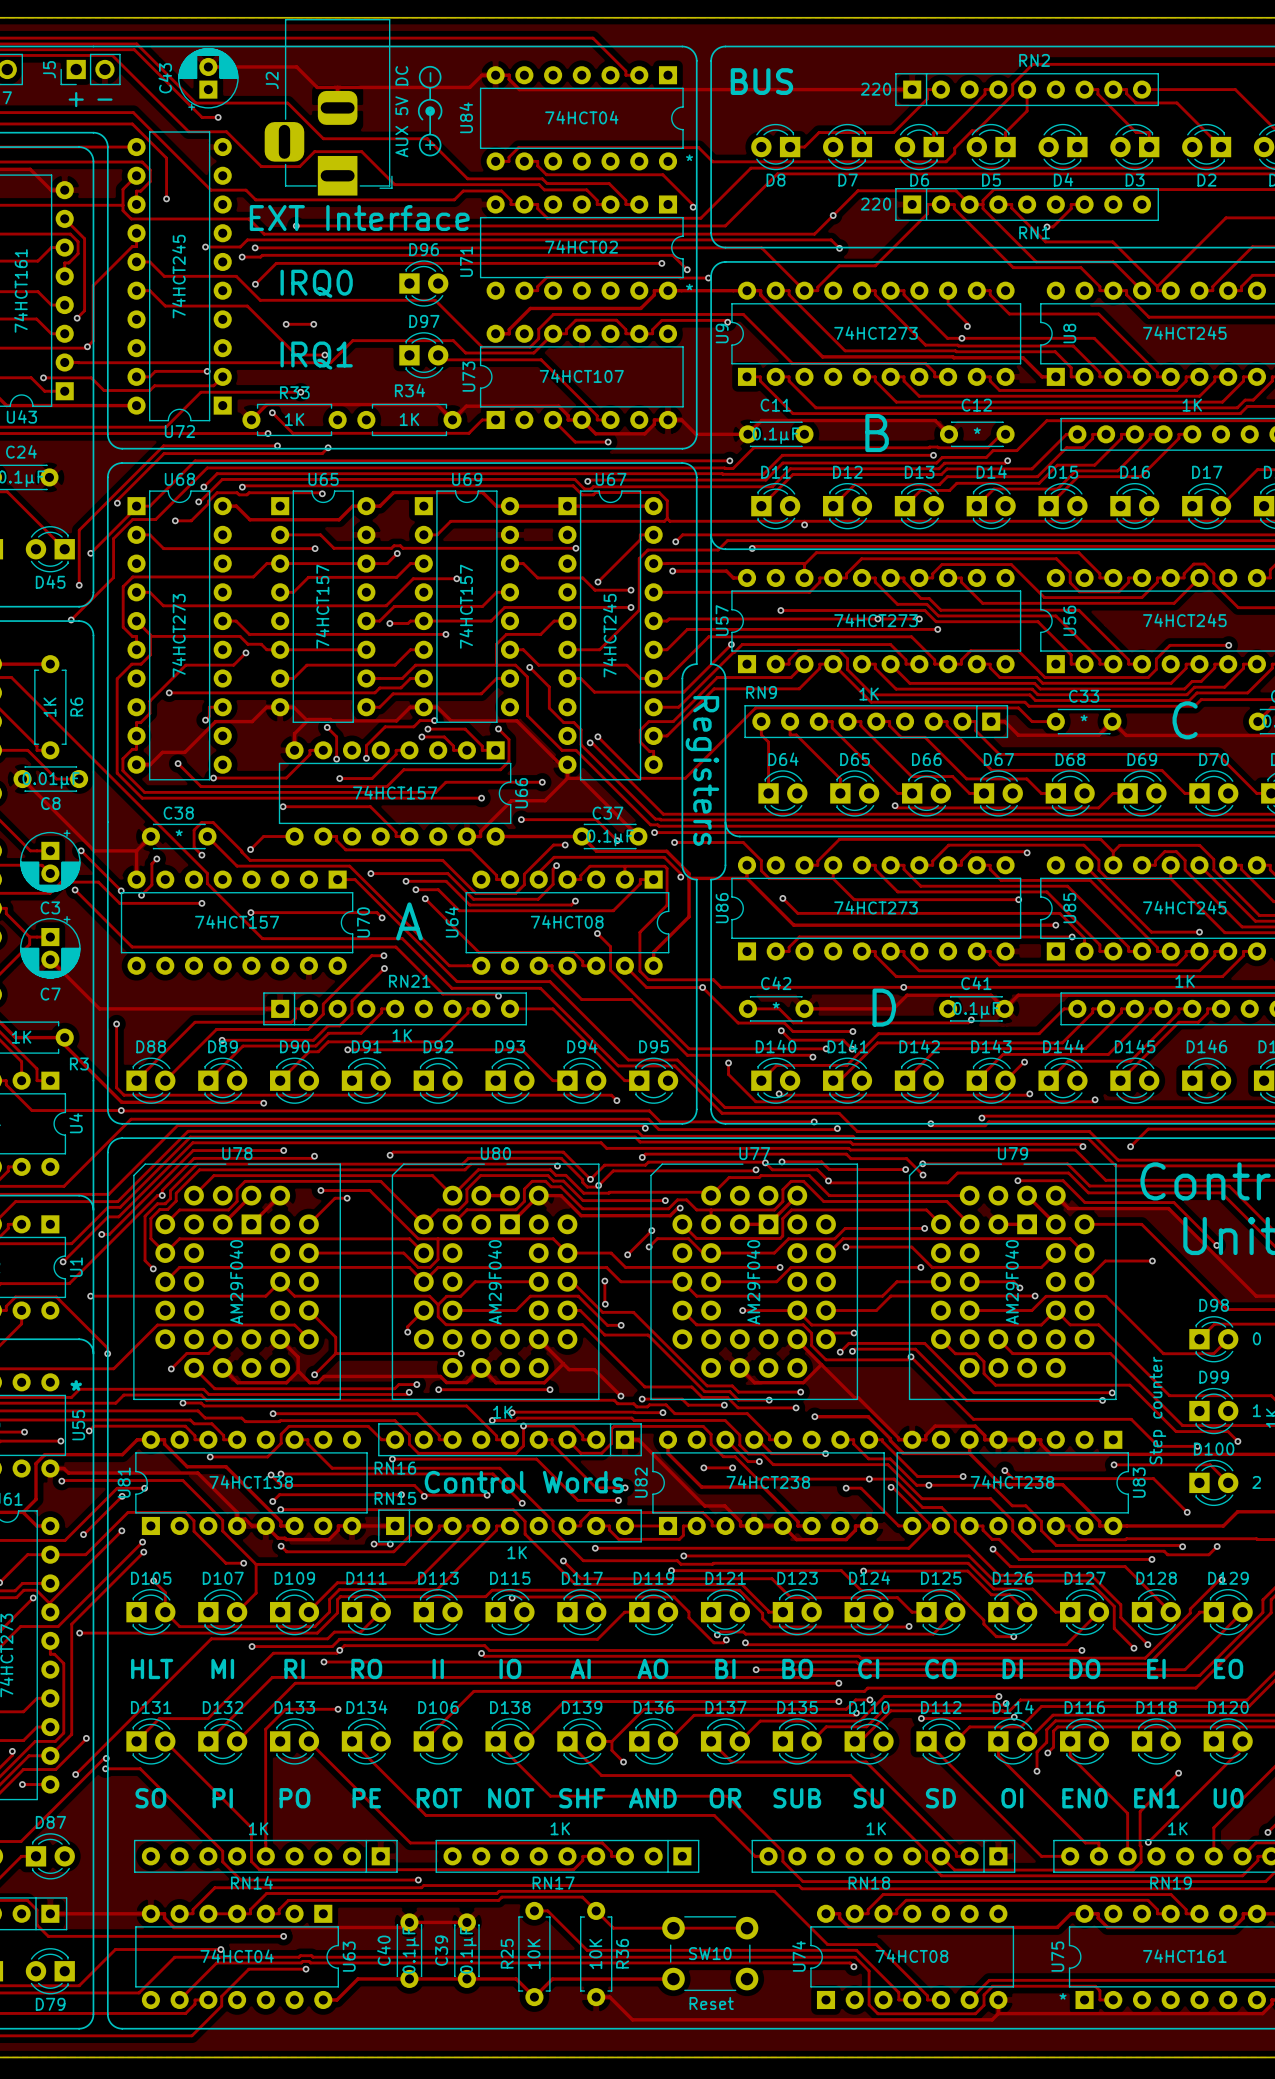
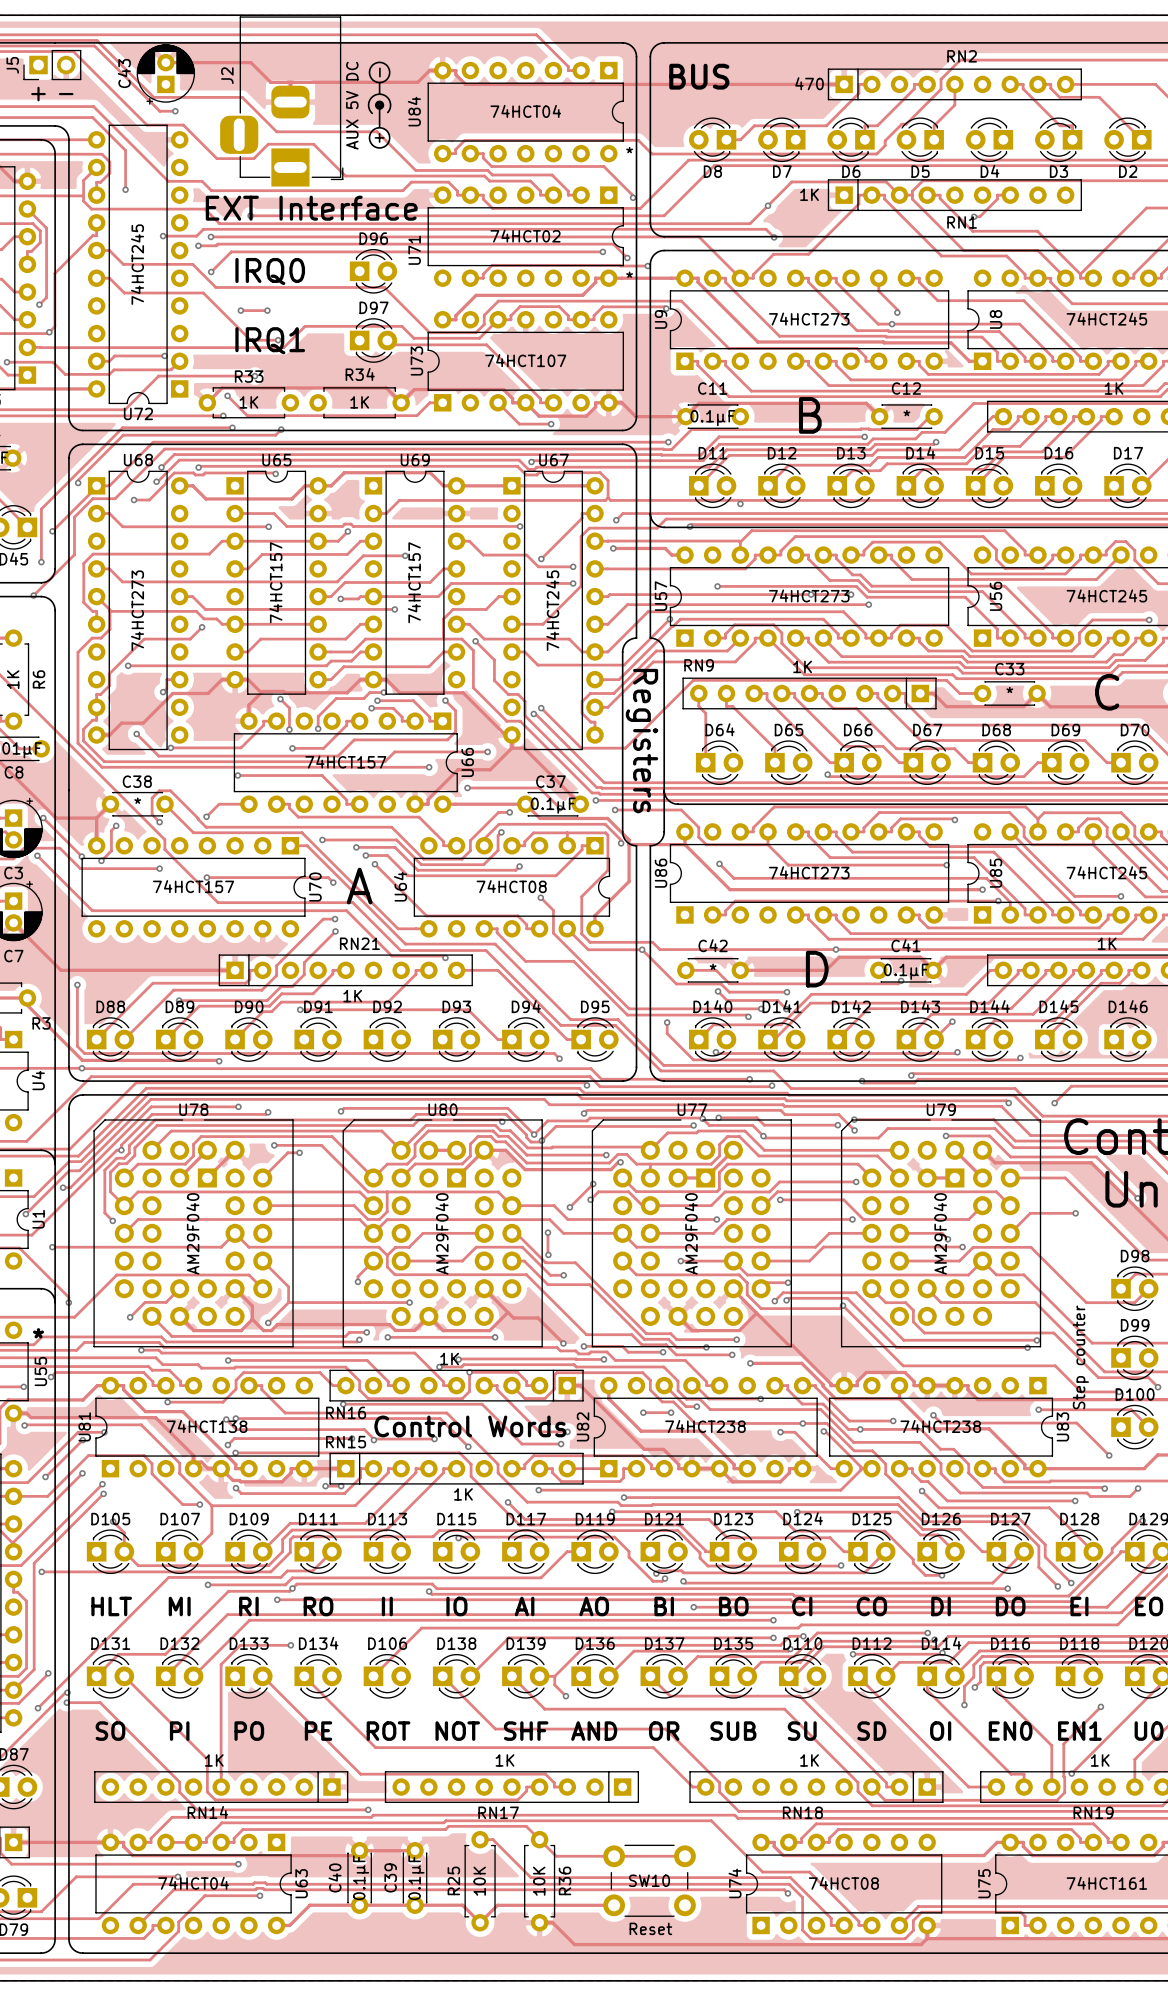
RN2 value: 220 (876, 89) -> 470 (809, 83)
RN1 value: 220 (876, 204) -> 1K (809, 194)
text: * (1063, 1996) -> none

